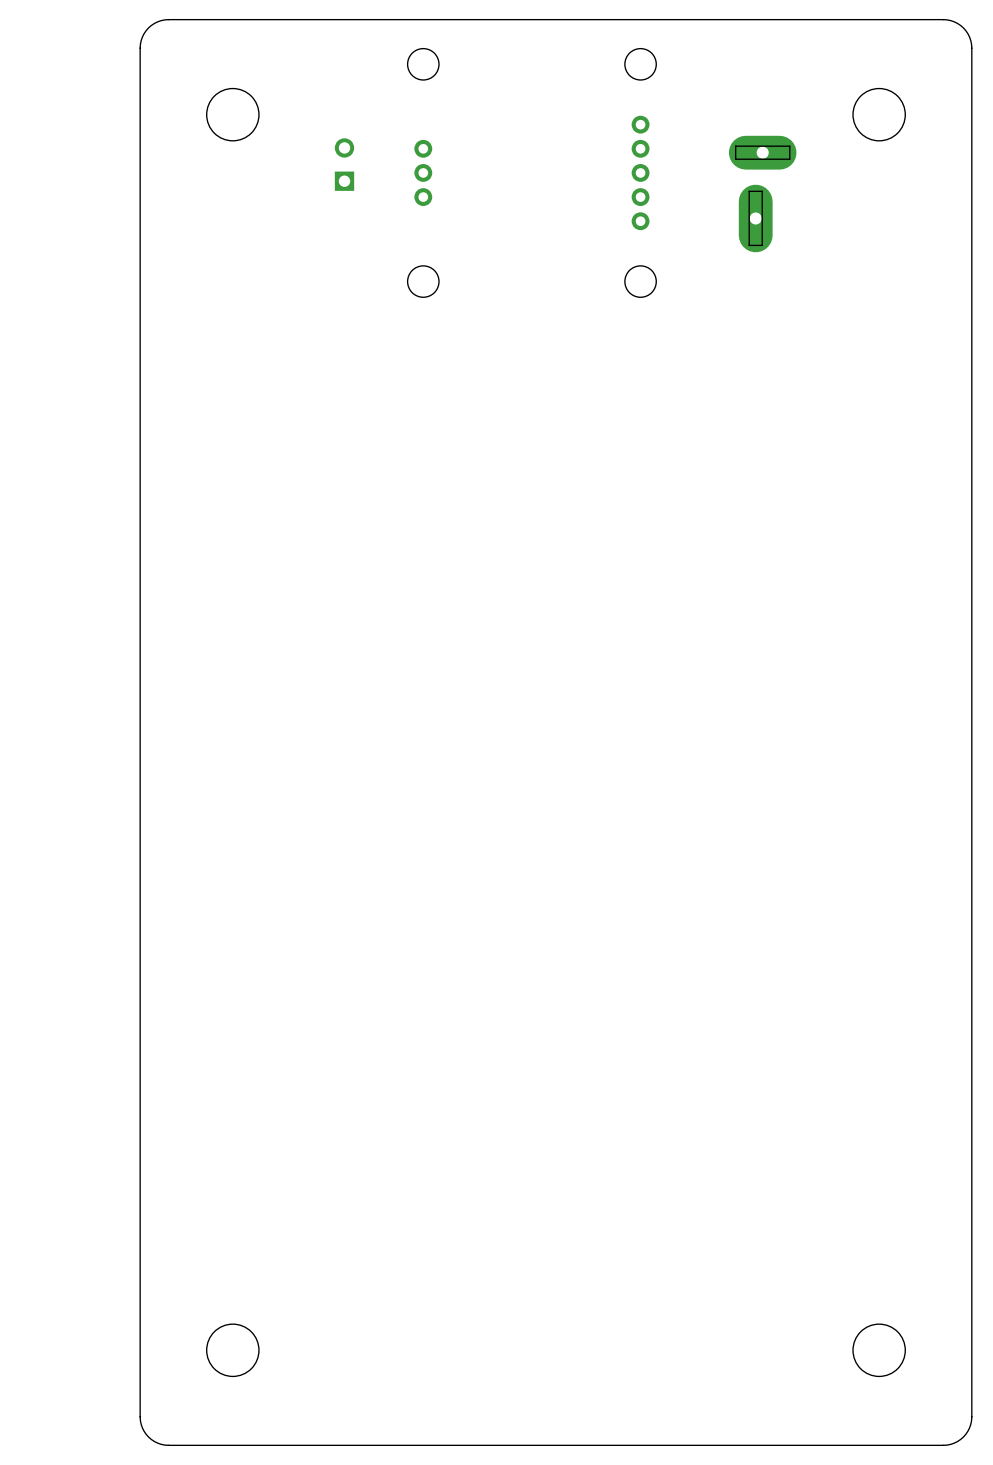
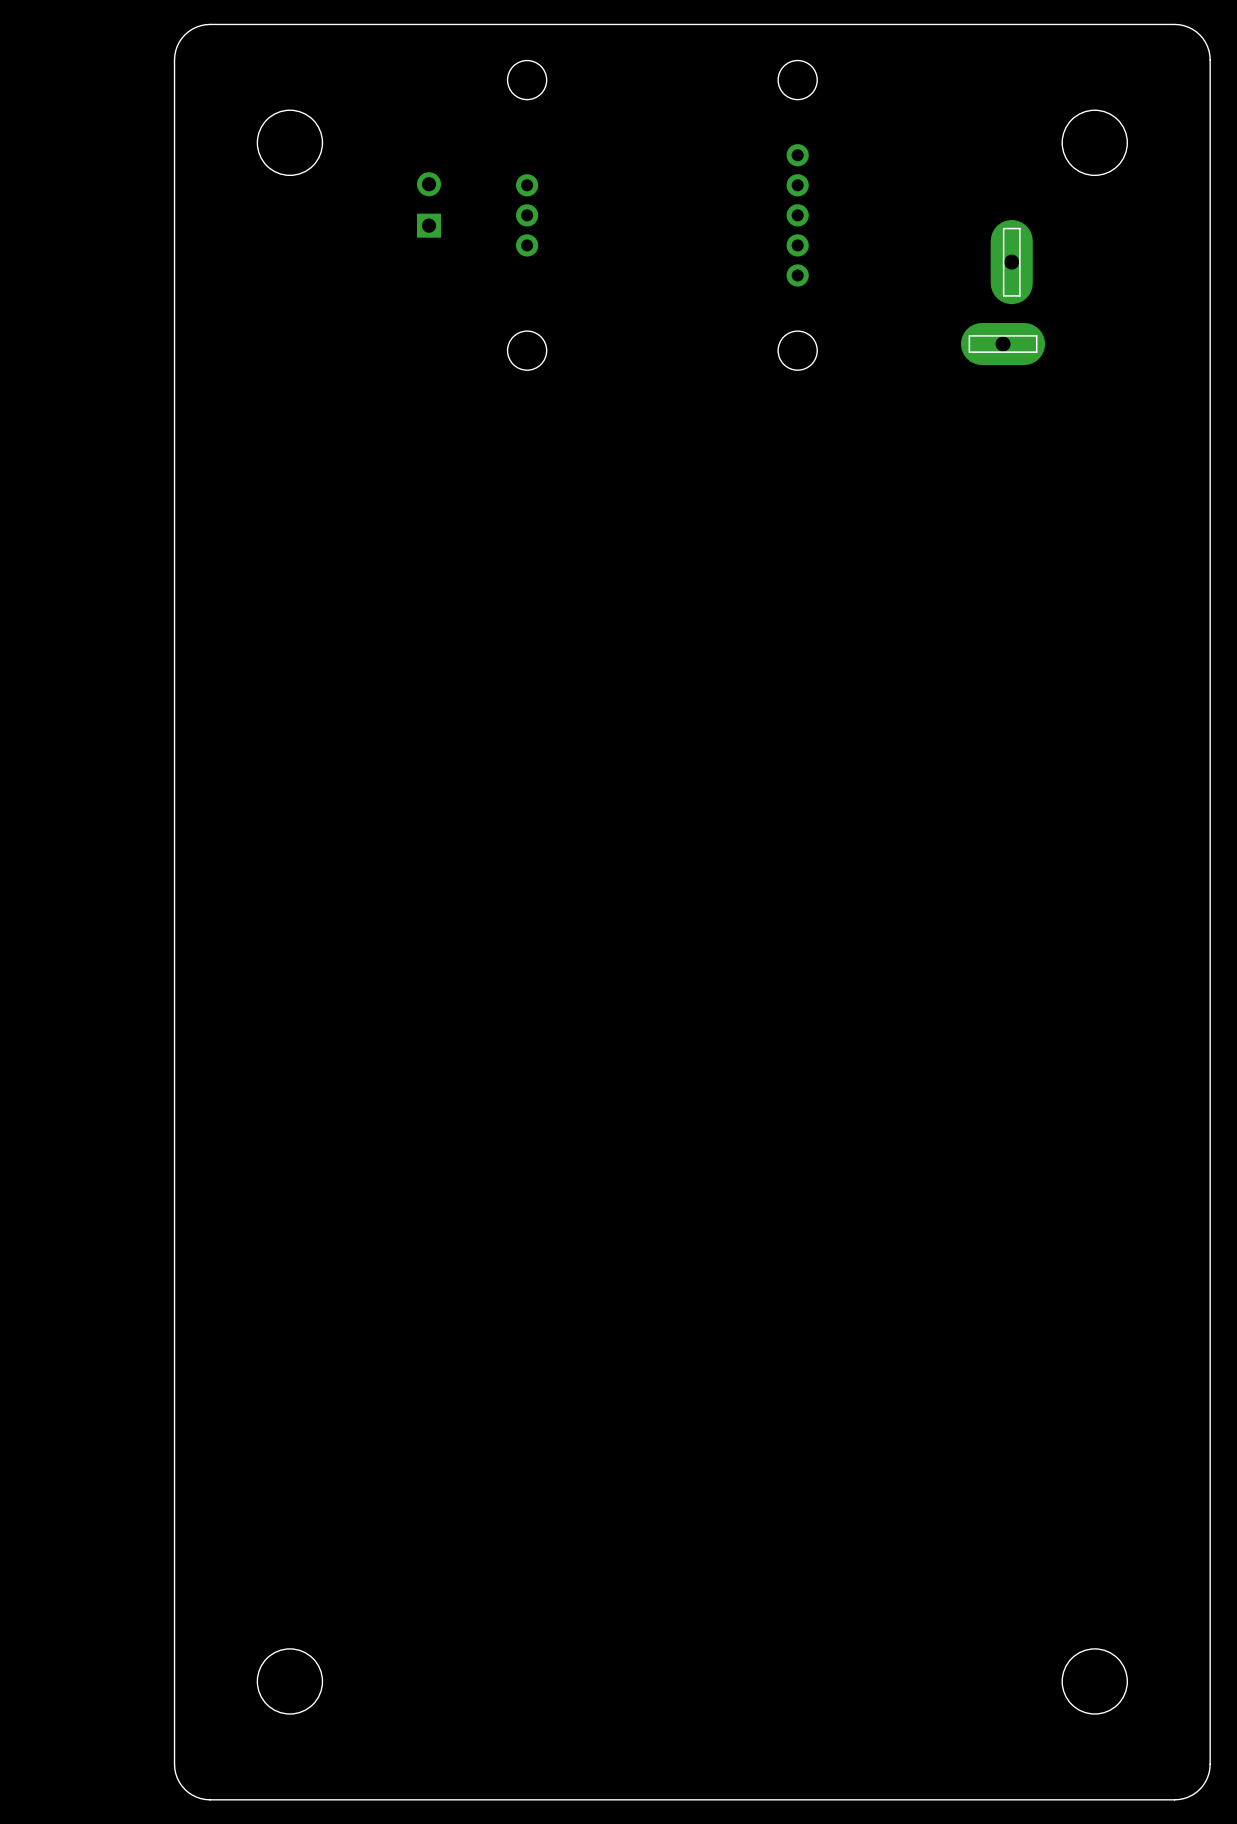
part rotation: 0° (762, 194) -> 180° (1003, 292)

